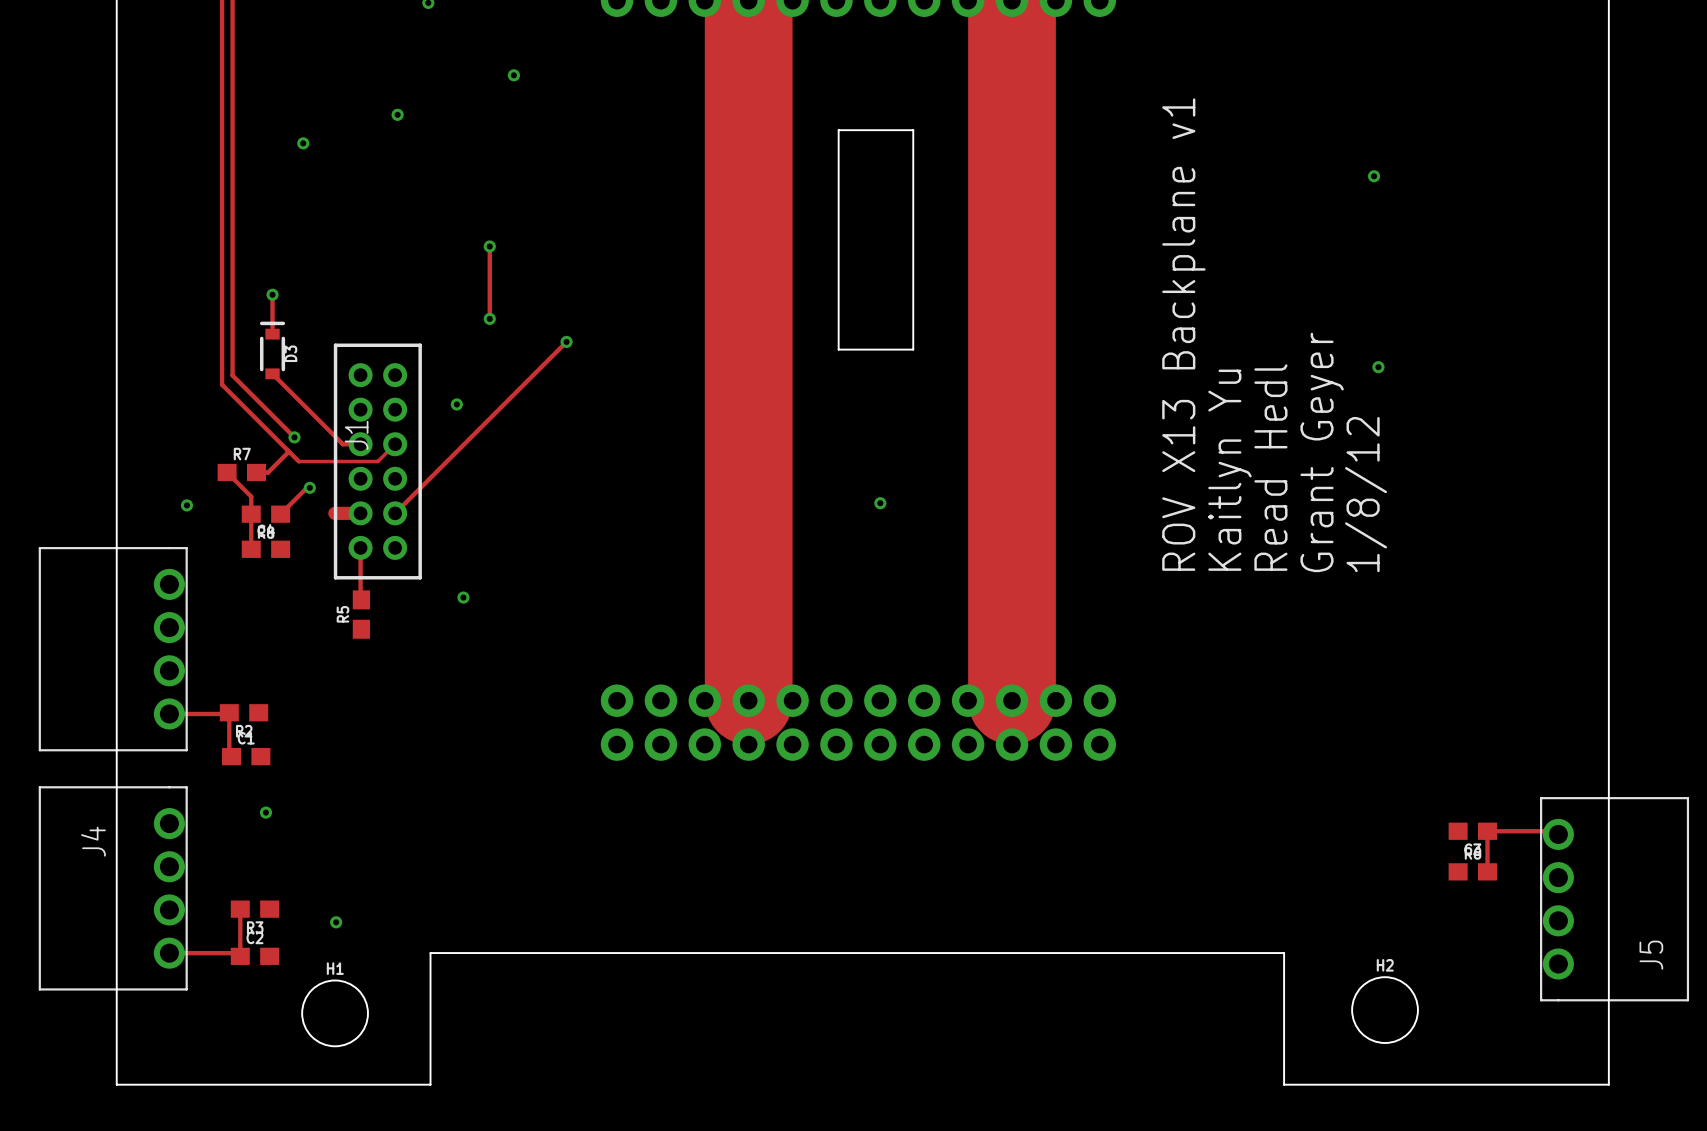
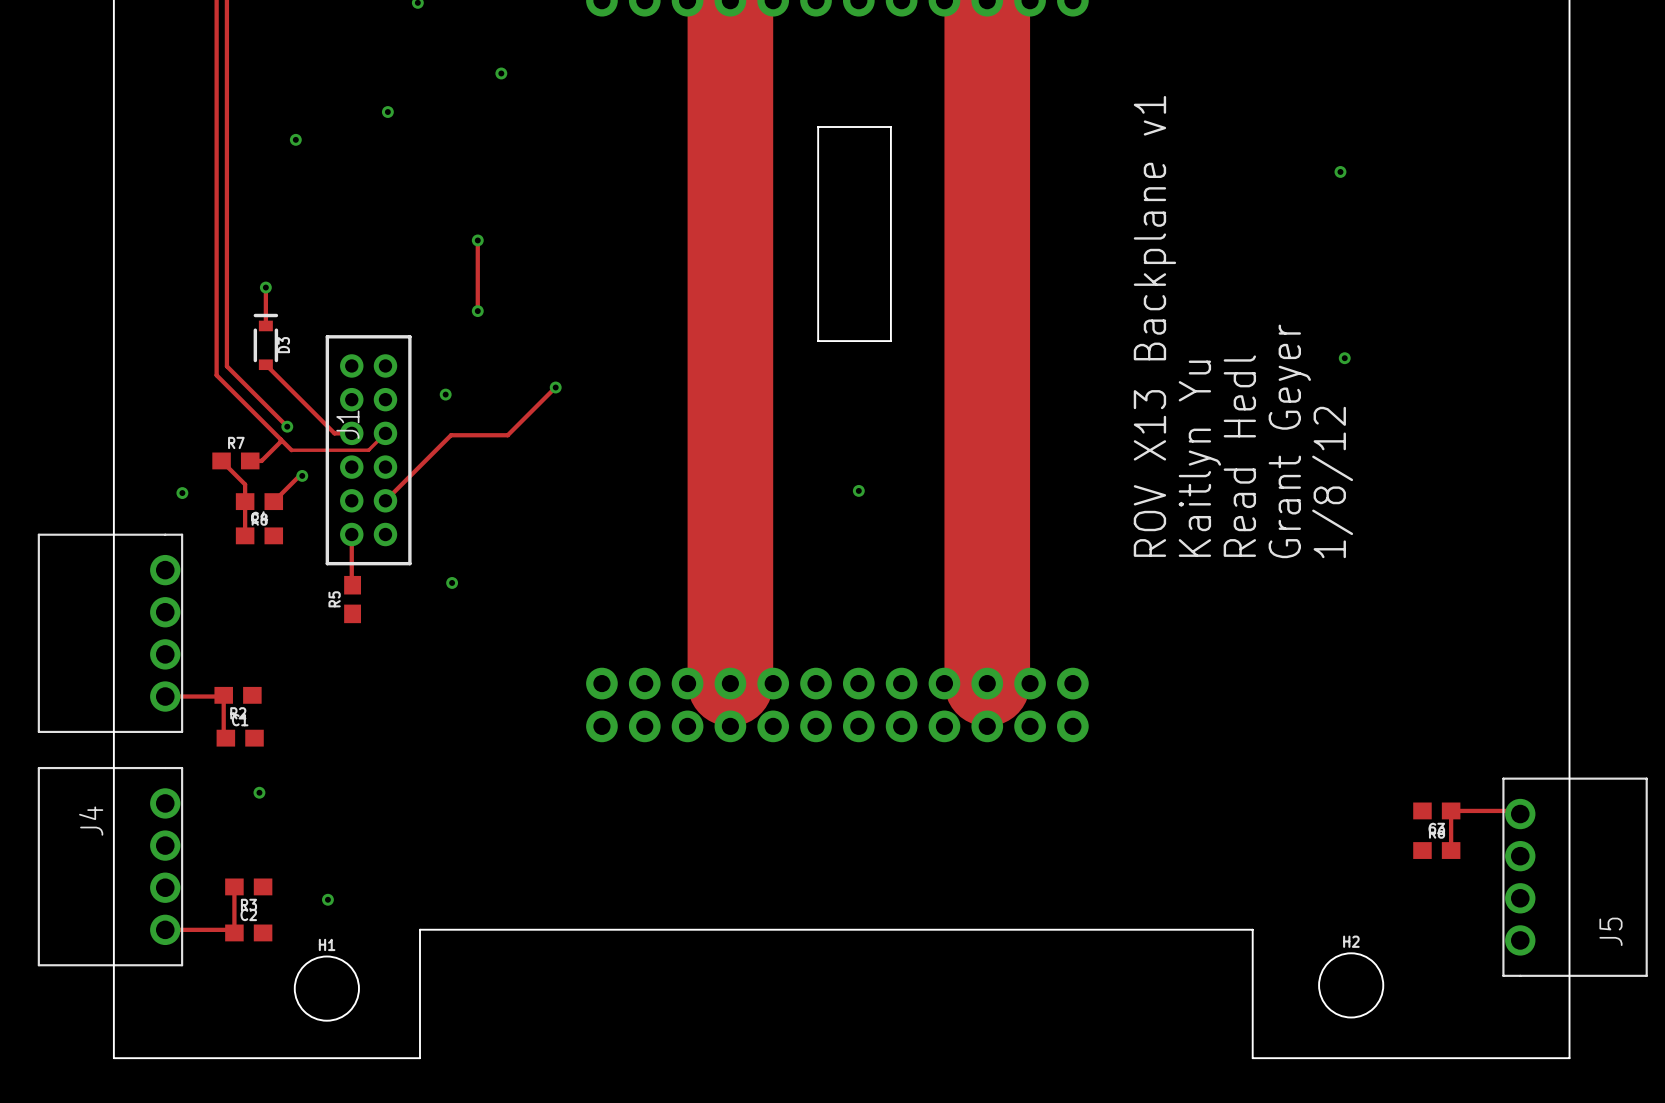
track: (566, 341) (462, 446) -> (555, 387) (507, 435) (451, 435)
via position: (566, 341) -> (555, 387)
track: (334, 513) (360, 513) -> none

